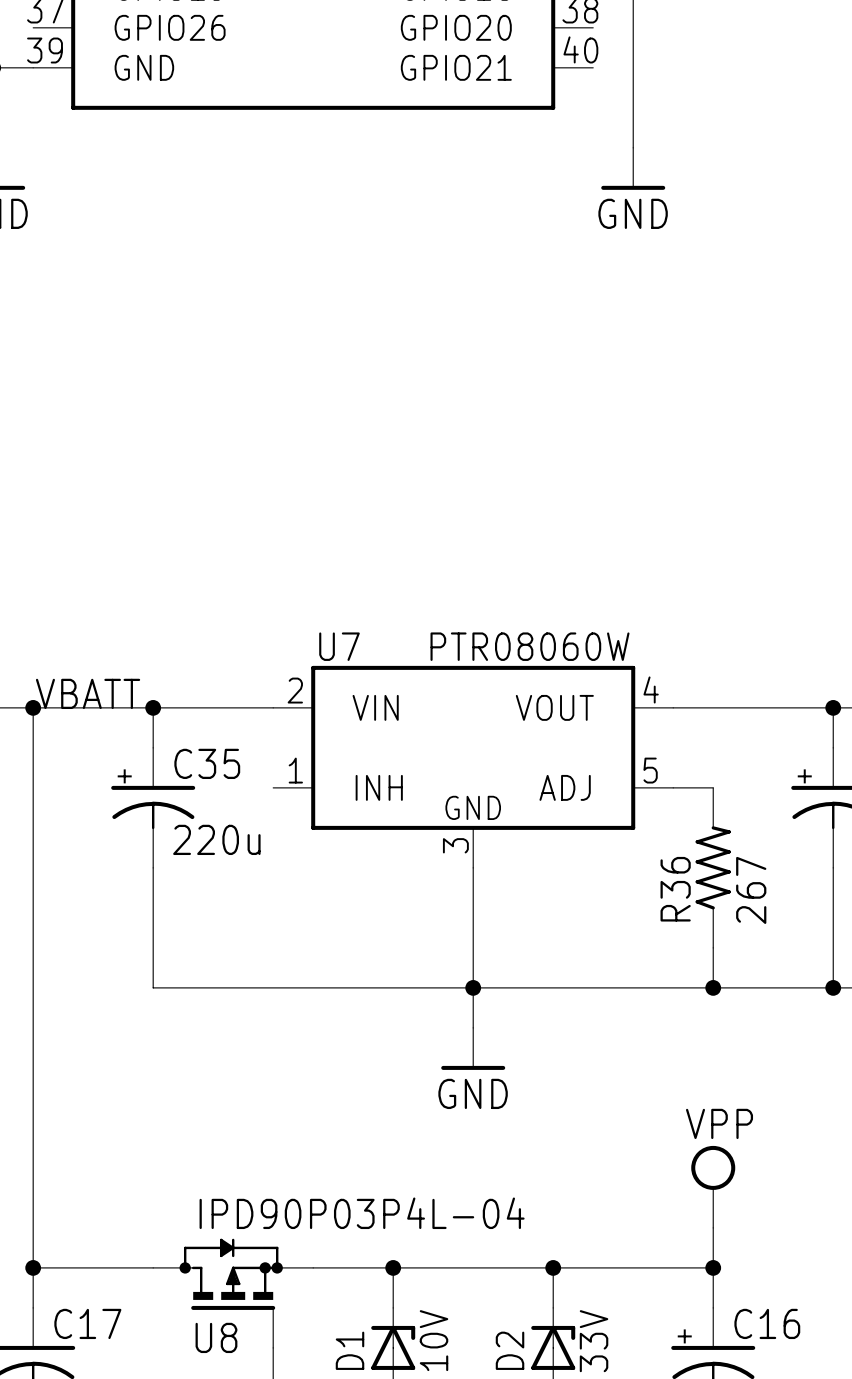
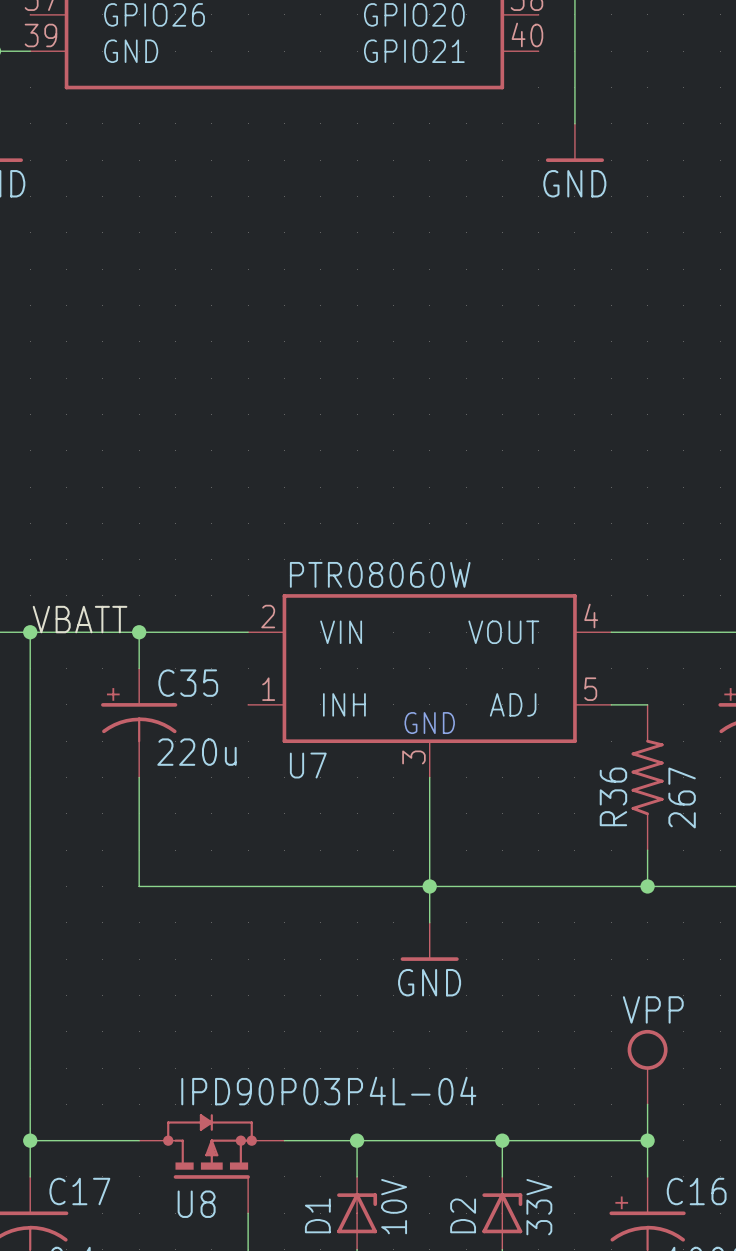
U7 name position: U7 (339, 646) -> U7 (308, 765)
U7 value position: PTR08060W (530, 646) -> PTR08060W (380, 574)

